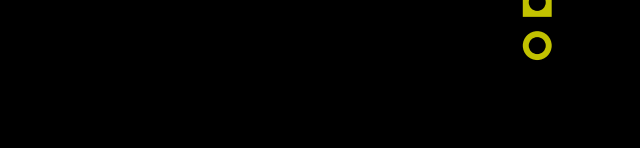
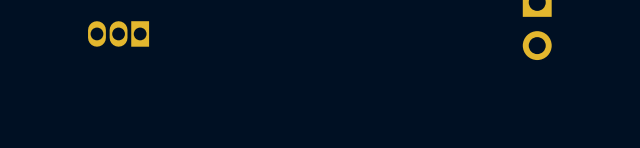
part: none -> (118, 33)

